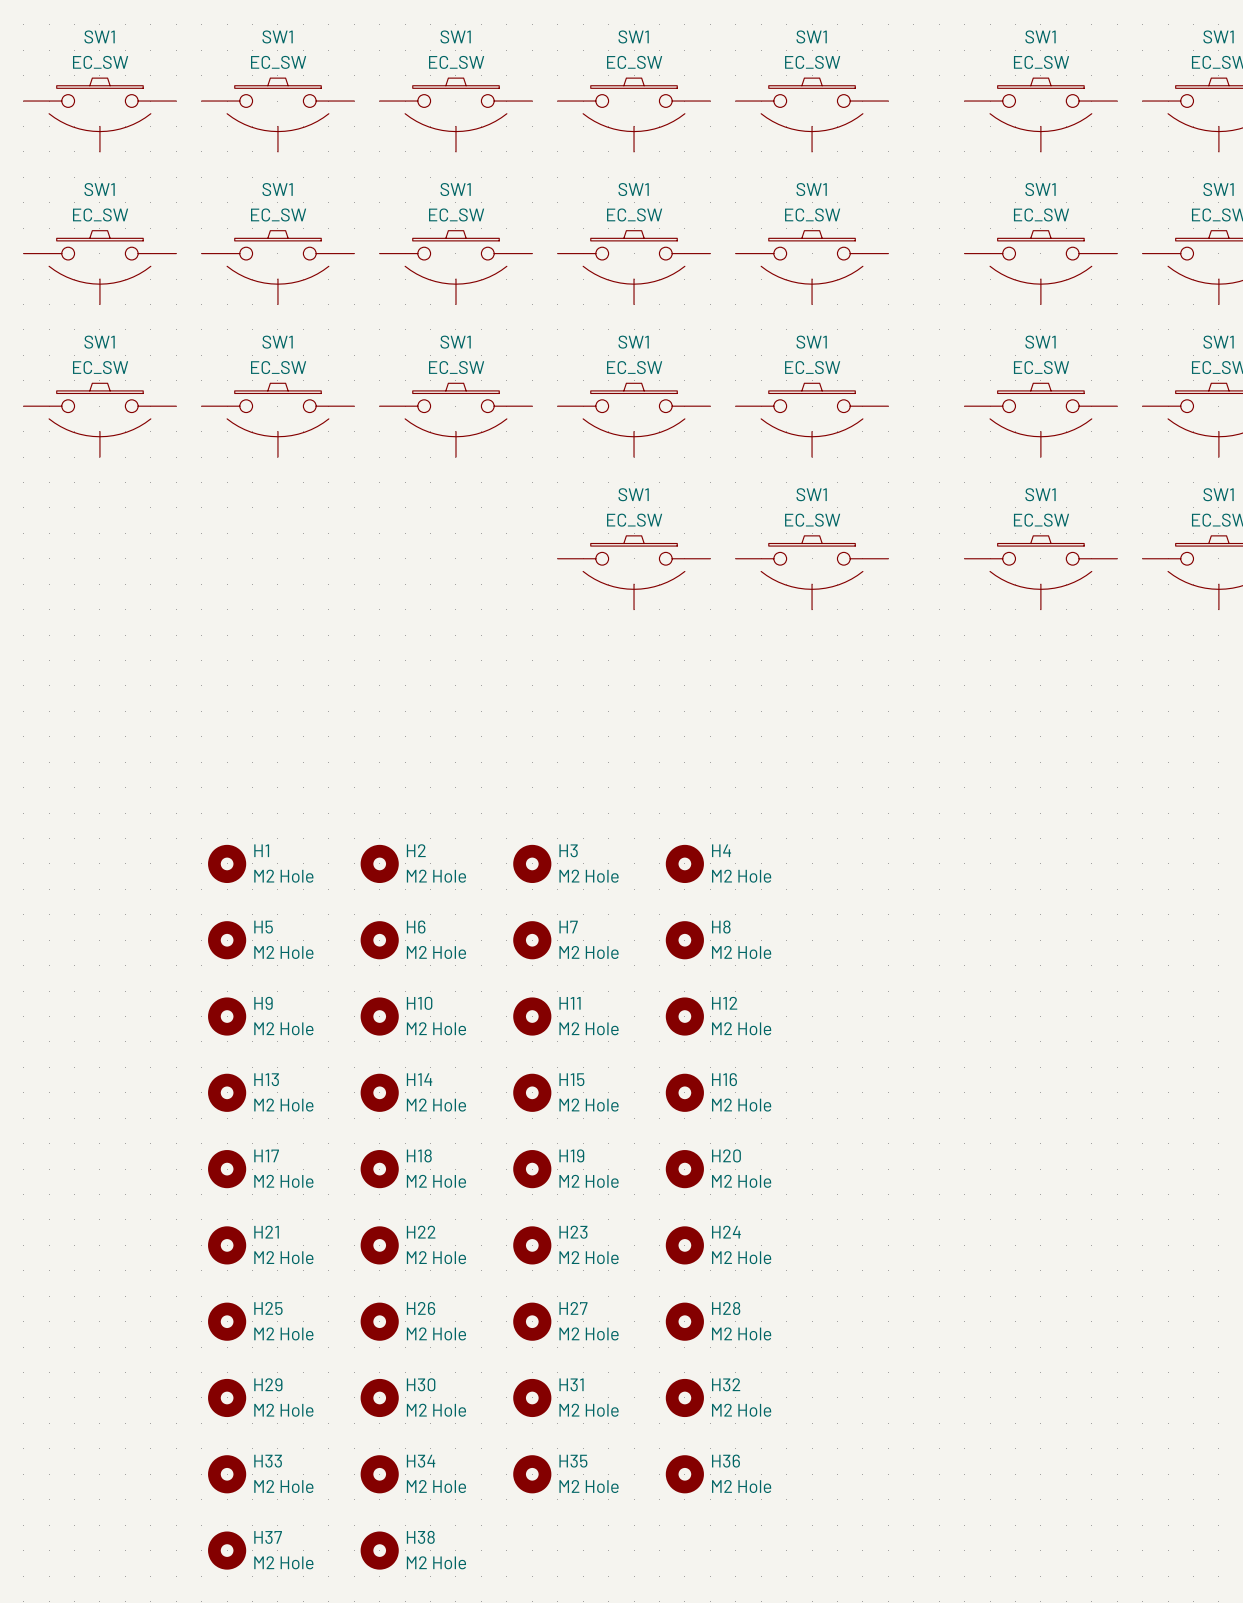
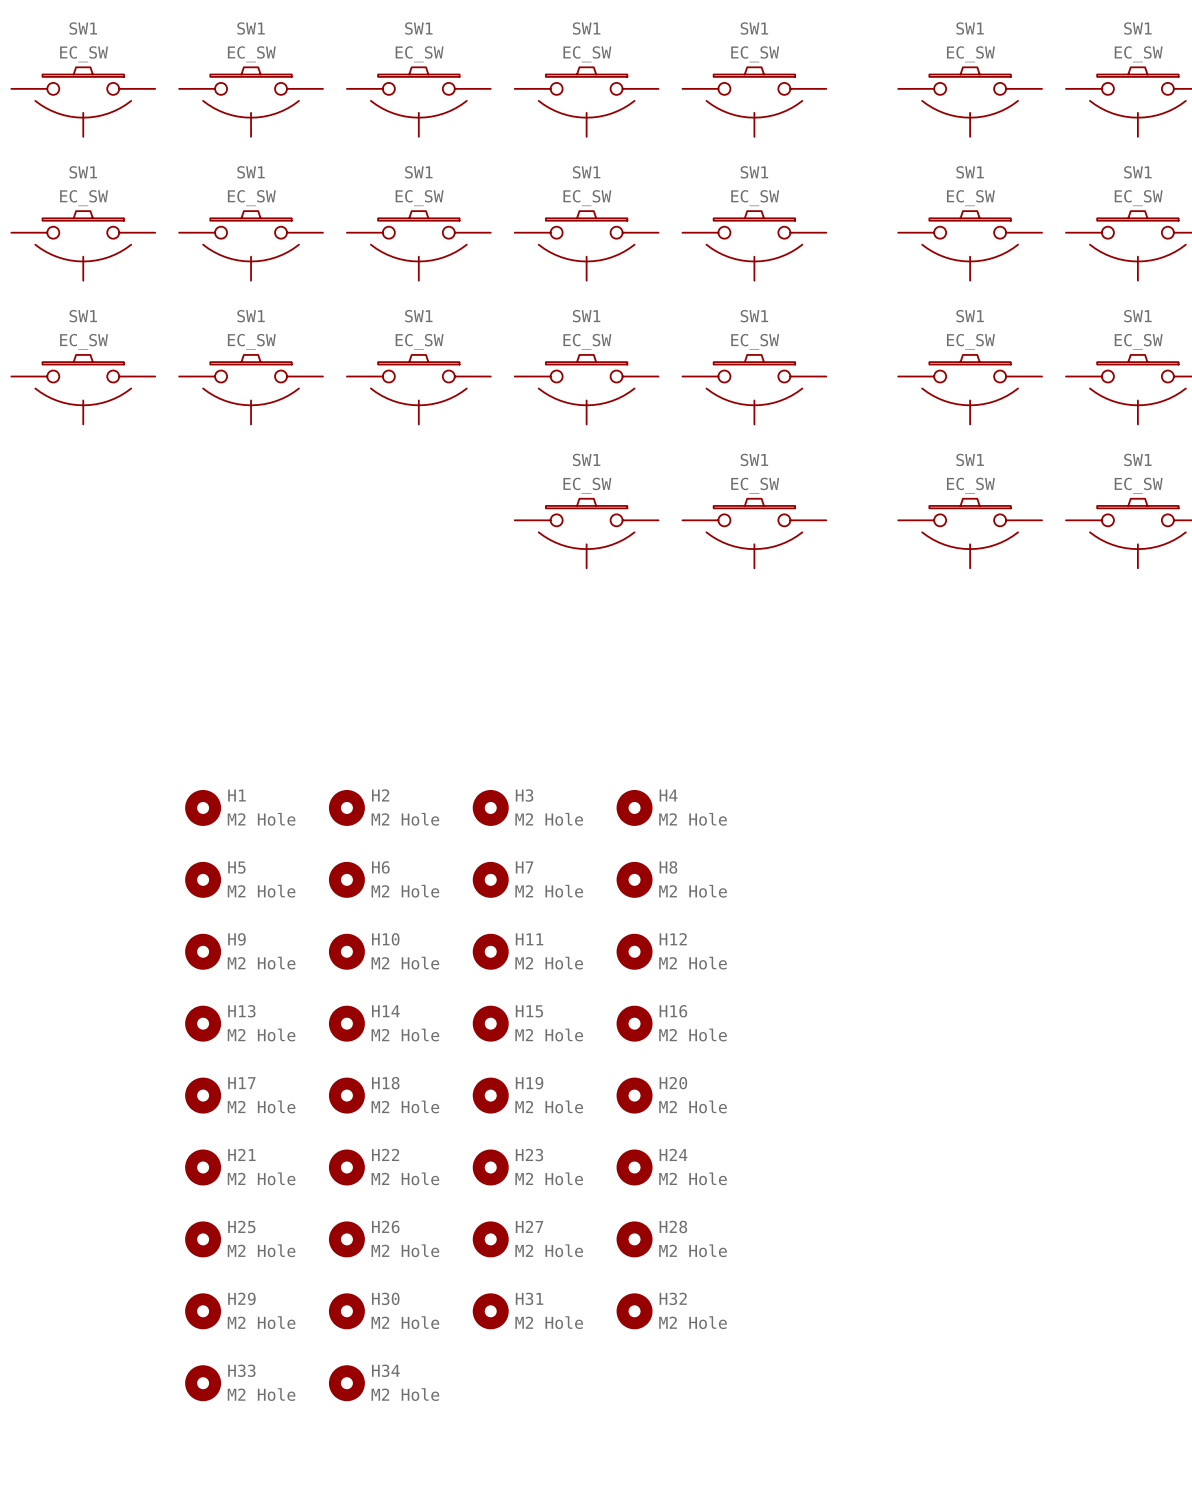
H35: M2 Hole (532, 1474) -> none
H36: M2 Hole (684, 1474) -> none
H37: M2 Hole (227, 1550) -> none
H38: M2 Hole (379, 1550) -> none

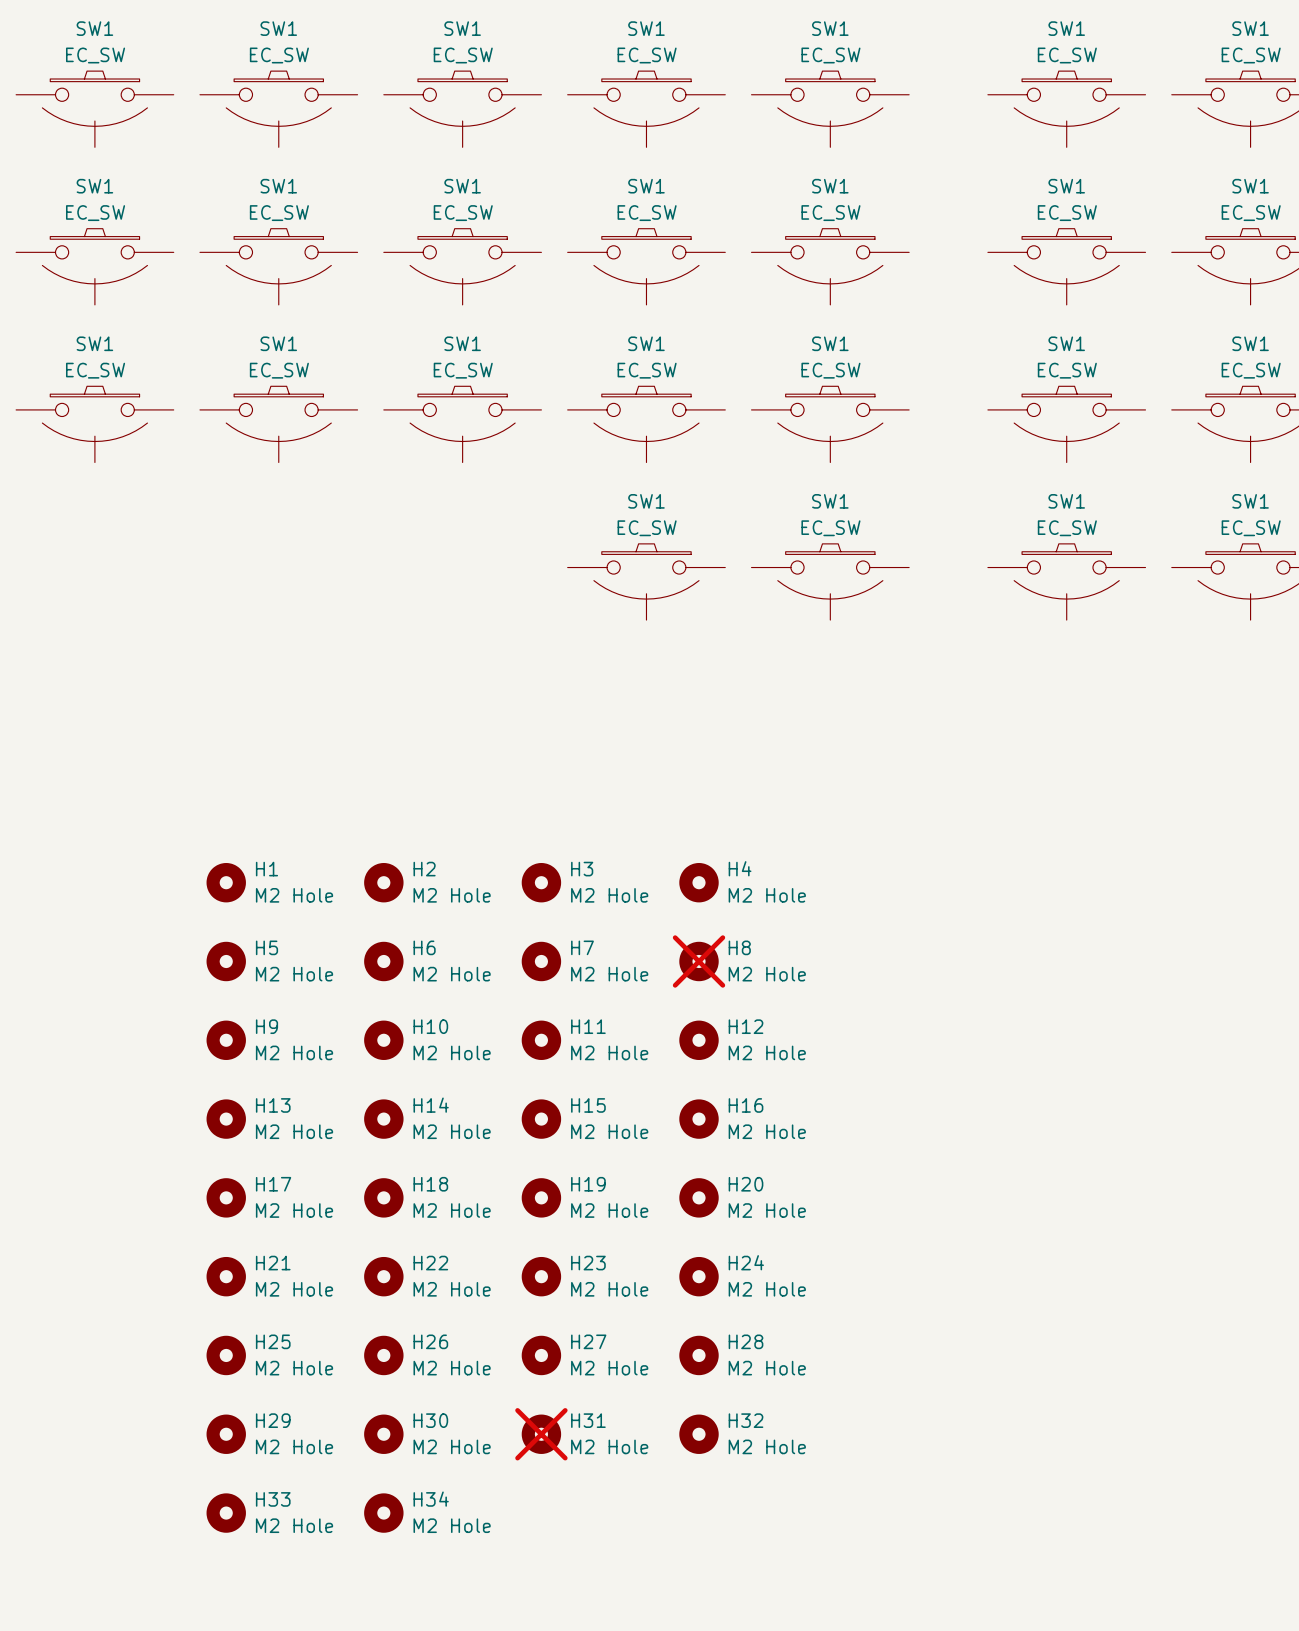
H8 do-not-place cross: none -> (699, 961)
H31 do-not-place cross: none -> (541, 1434)

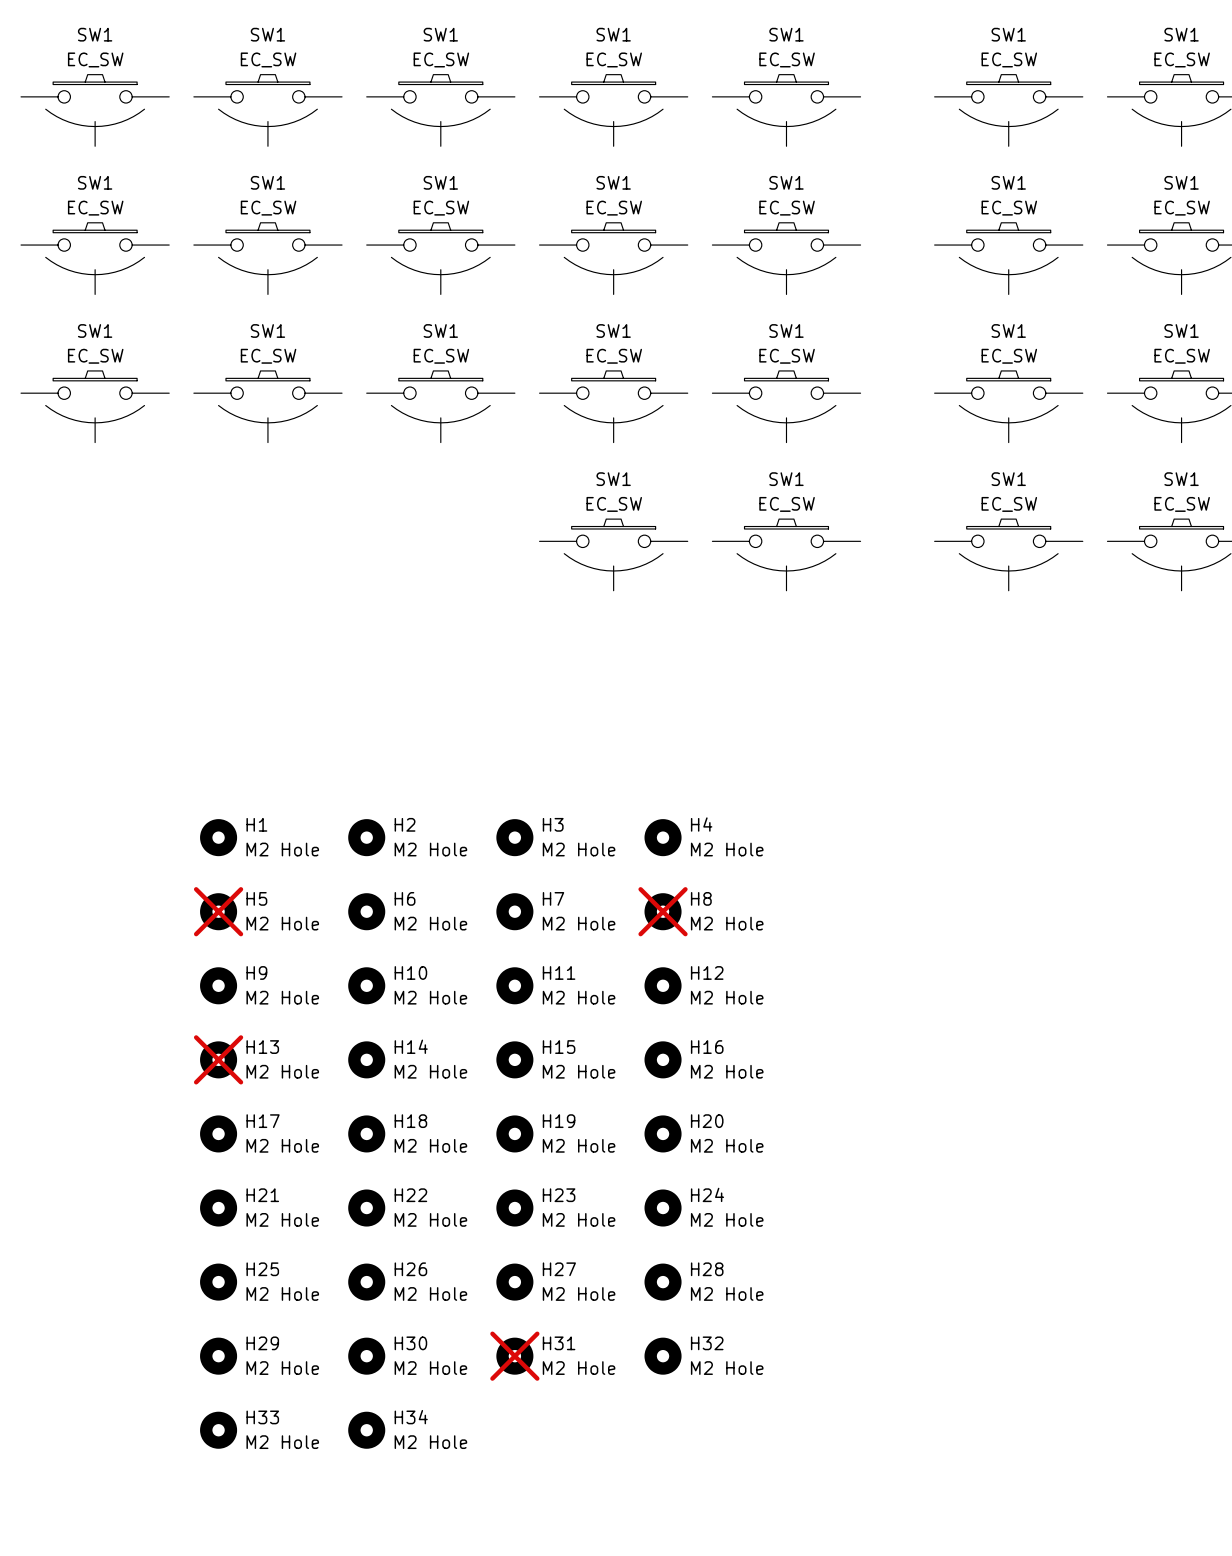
H5 do-not-place cross: none -> (218, 911)
H13 do-not-place cross: none -> (218, 1059)

